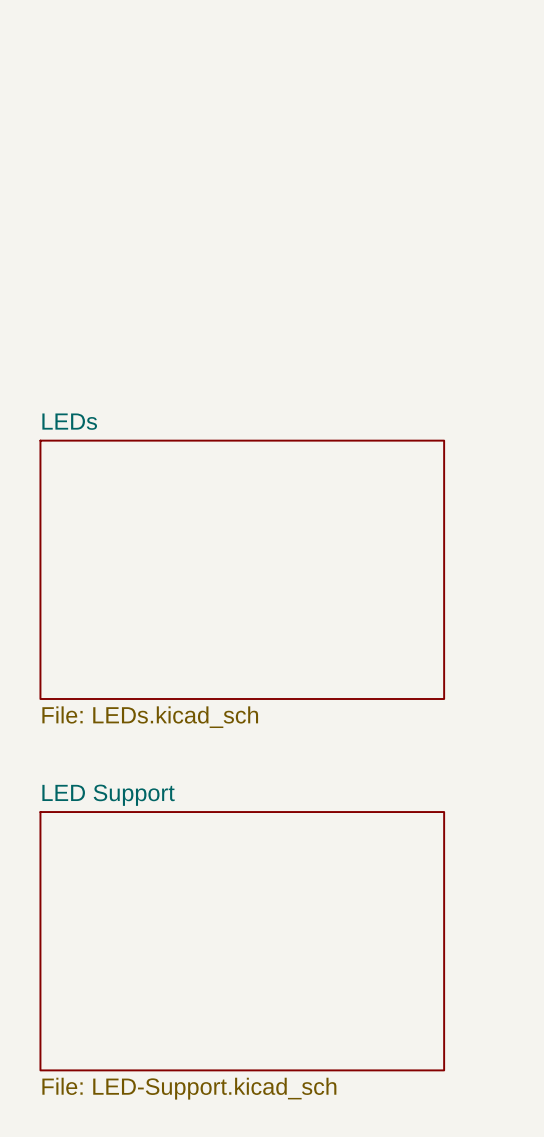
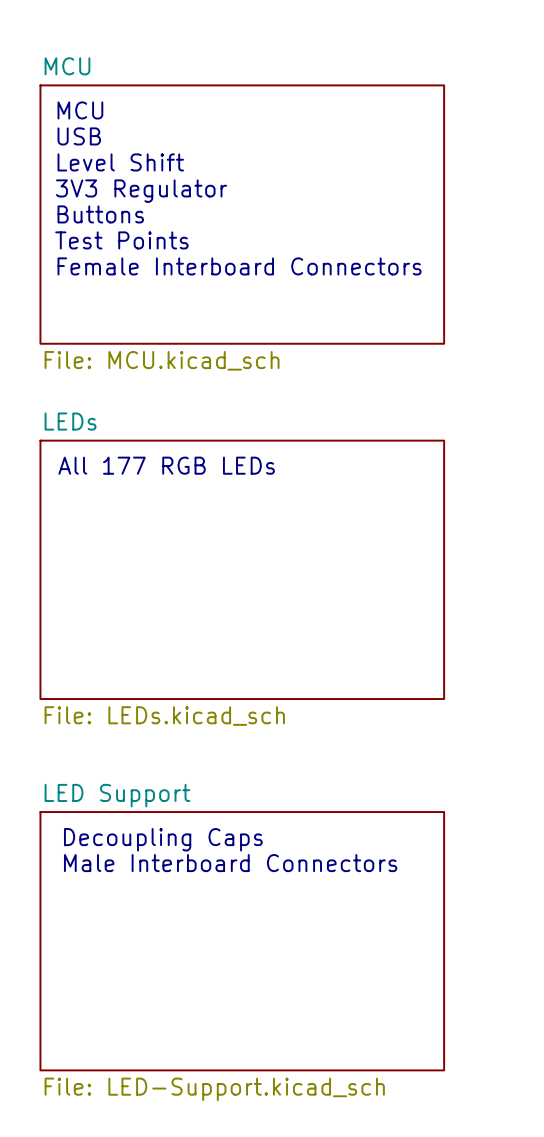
text: none -> MCU (80, 110)
text: none -> USB (79, 136)
text: none -> Level Shift (120, 162)
text: none -> 3V3 Regulator (141, 191)
text: none -> Buttons (100, 214)
sheet MCU: none -> File: MCU.kicad_sch (242, 214)
text: none -> Test Points (121, 240)
text: none -> Female Interboard Connectors (239, 266)
text: none -> All 177 RGB LEDs (166, 465)
text: none -> Decoupling Caps (163, 839)
text: none -> Male Interboard Connectors (230, 863)

